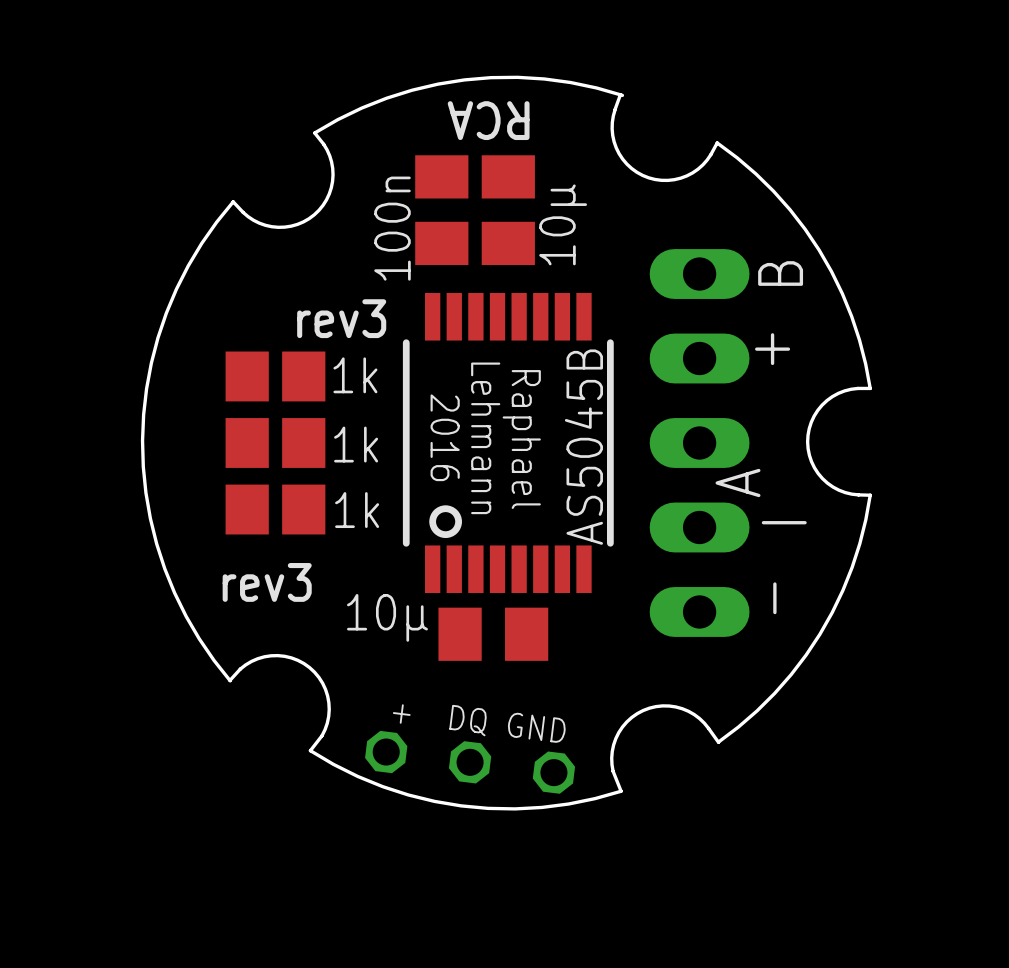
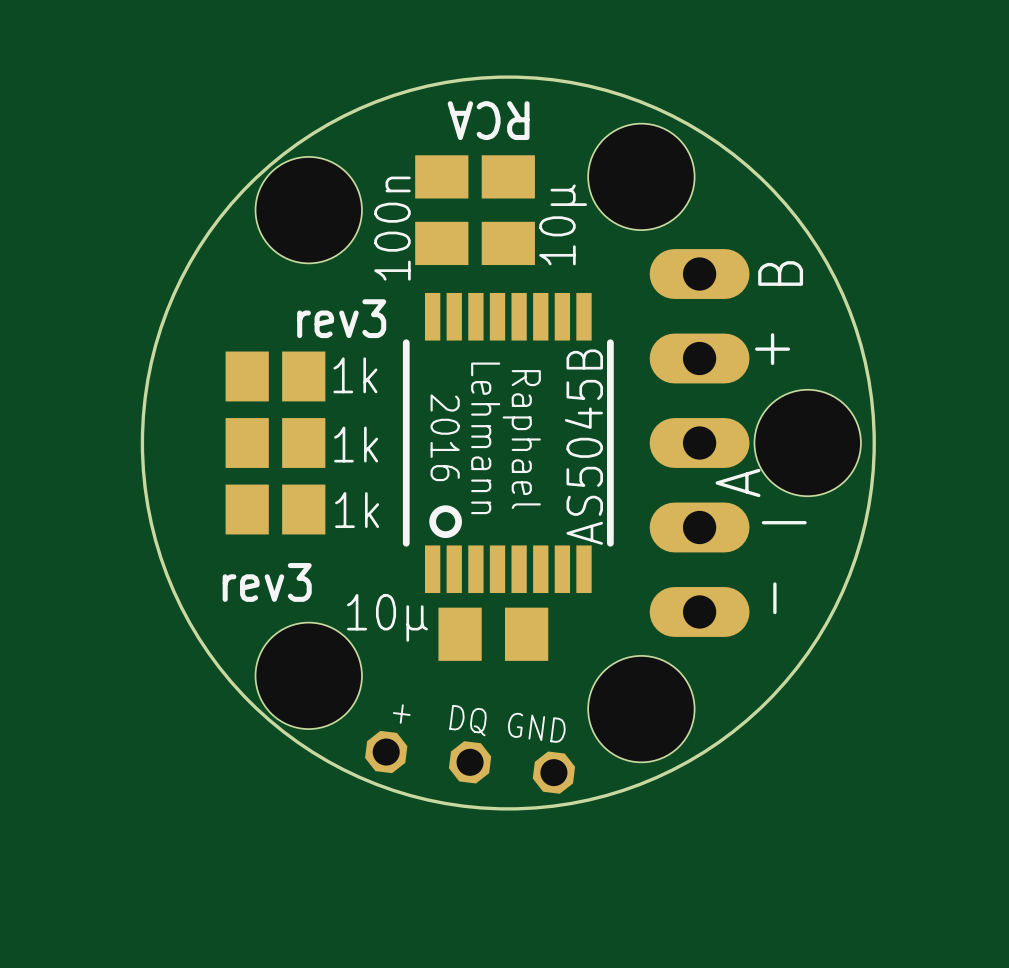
round board edge: none -> [140, 75, 876, 811]
board edge: (620, 94) (615, 109) -> none
board edge: (622, 95) (570, 82) (517, 77) (490, 77) (438, 84) (386, 98) (337, 119) (314, 132) (329, 155) (333, 174) (331, 187) (326, 199) (314, 214) (303, 221) (291, 226) (271, 226) (253, 220) (233, 201) (201, 243) (176, 289) (157, 337) (146, 388) (142, 440) (143, 466) (150, 518) (164, 568) (186, 616) (199, 638) (230, 680) -> none
board edge: (615, 109) (612, 128) (616, 147) (626, 164) (642, 175) (655, 179) (668, 180) (686, 175) (702, 164) (717, 142) (755, 173) (773, 191) (805, 229) (831, 271) (851, 316) (859, 340) (870, 388) (844, 390) (827, 400) (814, 416) (808, 435) (808, 448) (811, 461) (822, 478) (833, 487) (845, 492) (870, 495) (859, 543) (842, 590) (819, 634) (791, 674) (757, 710) (718, 742) -> none
hole: none -> (641, 176)
hole: none -> (308, 210)
hole: none -> (807, 443)
board edge: (240, 668) (229, 680) -> none
board edge: (240, 669) (251, 661) (271, 655) (284, 656) (303, 663) (314, 672) (322, 683) (328, 702) (328, 716) (325, 729) (310, 750) (357, 776) (382, 786) (434, 801) (461, 805) (488, 808) (541, 807) (595, 798) (621, 791) (611, 764) (613, 744) (618, 732) (626, 721) (637, 713) (649, 708) (669, 706) (688, 711) (704, 723) (718, 742) -> none
hole: none -> (308, 675)
hole: none -> (641, 709)

